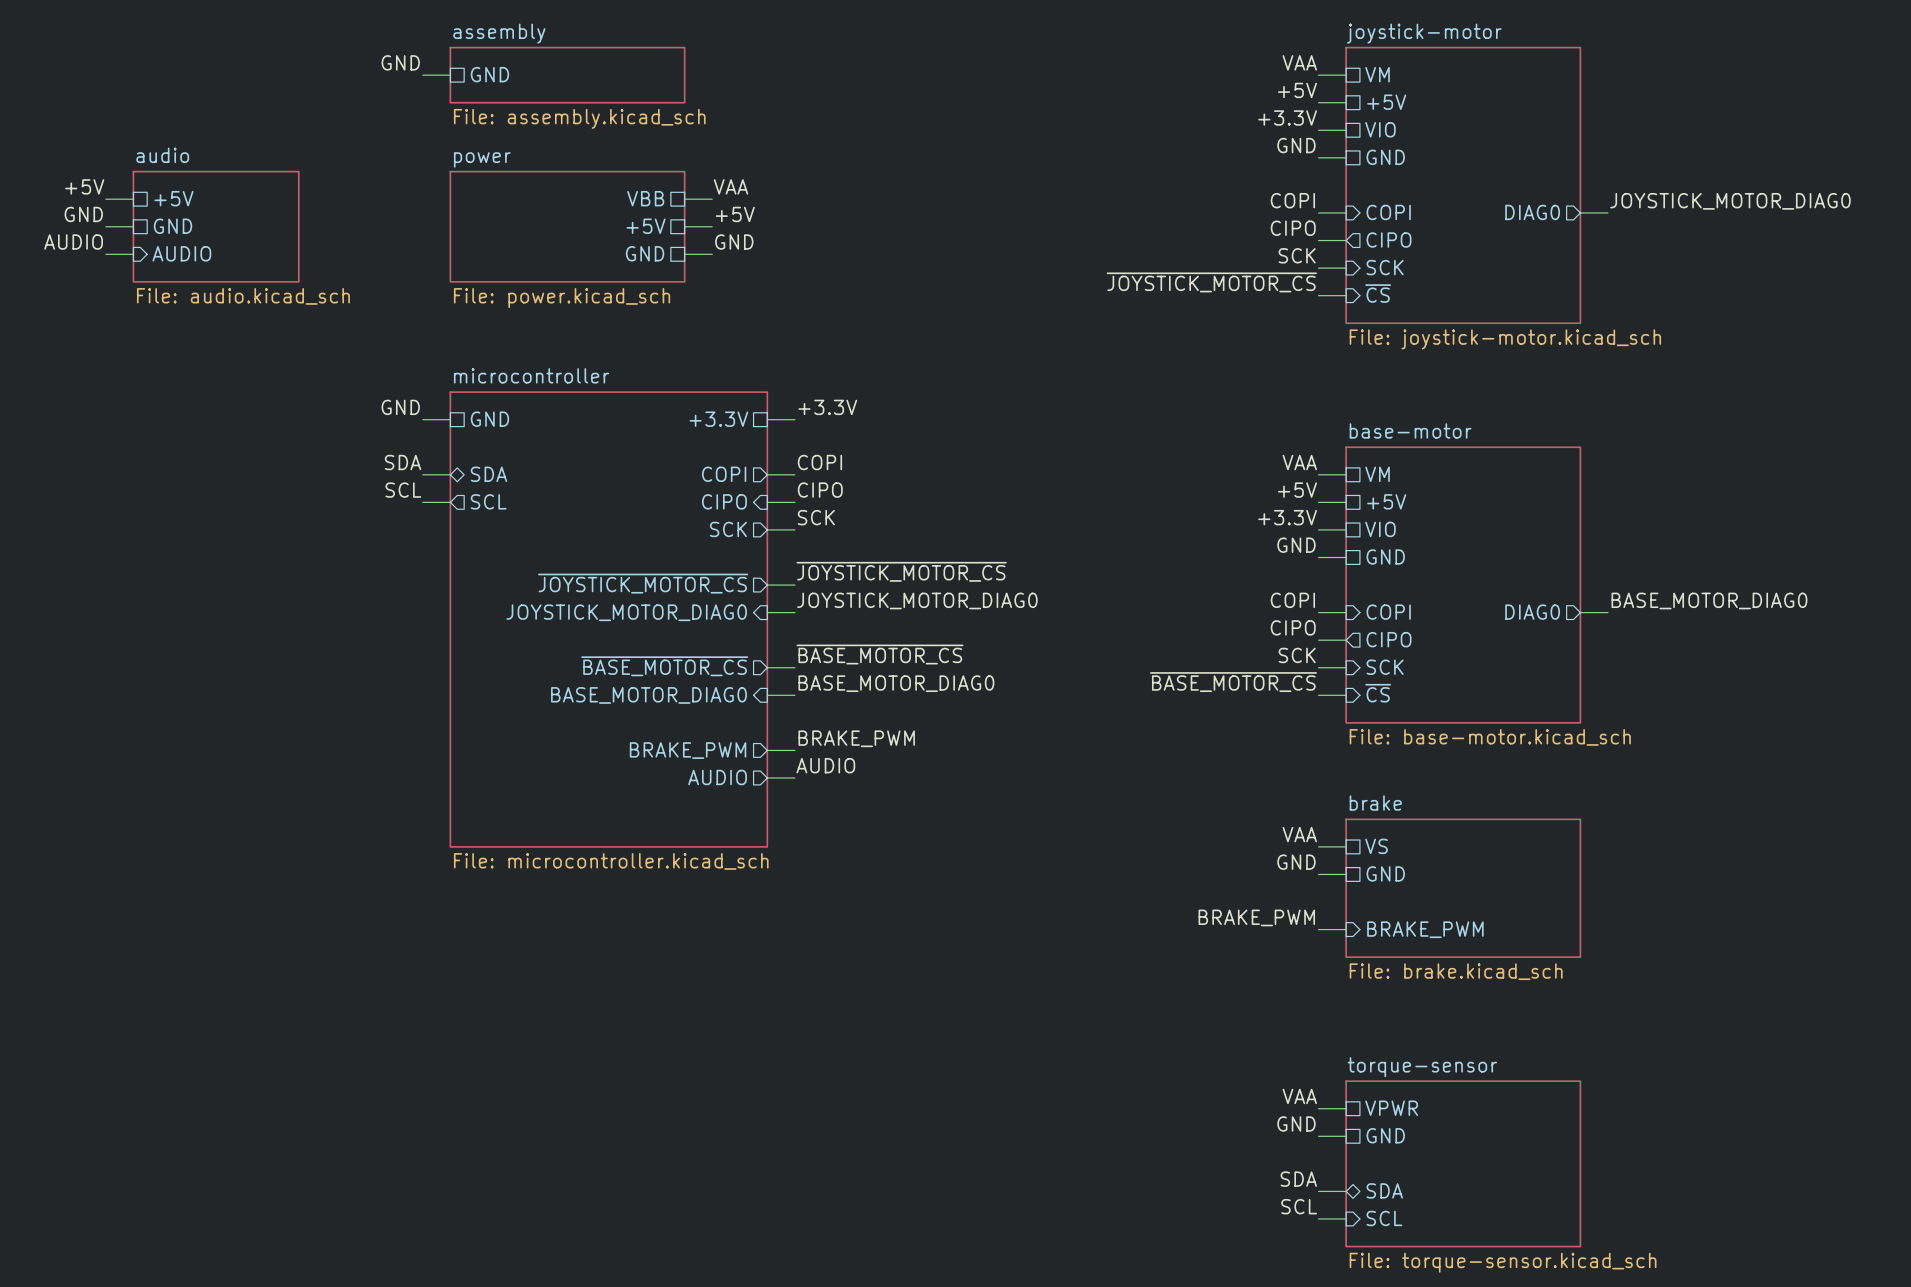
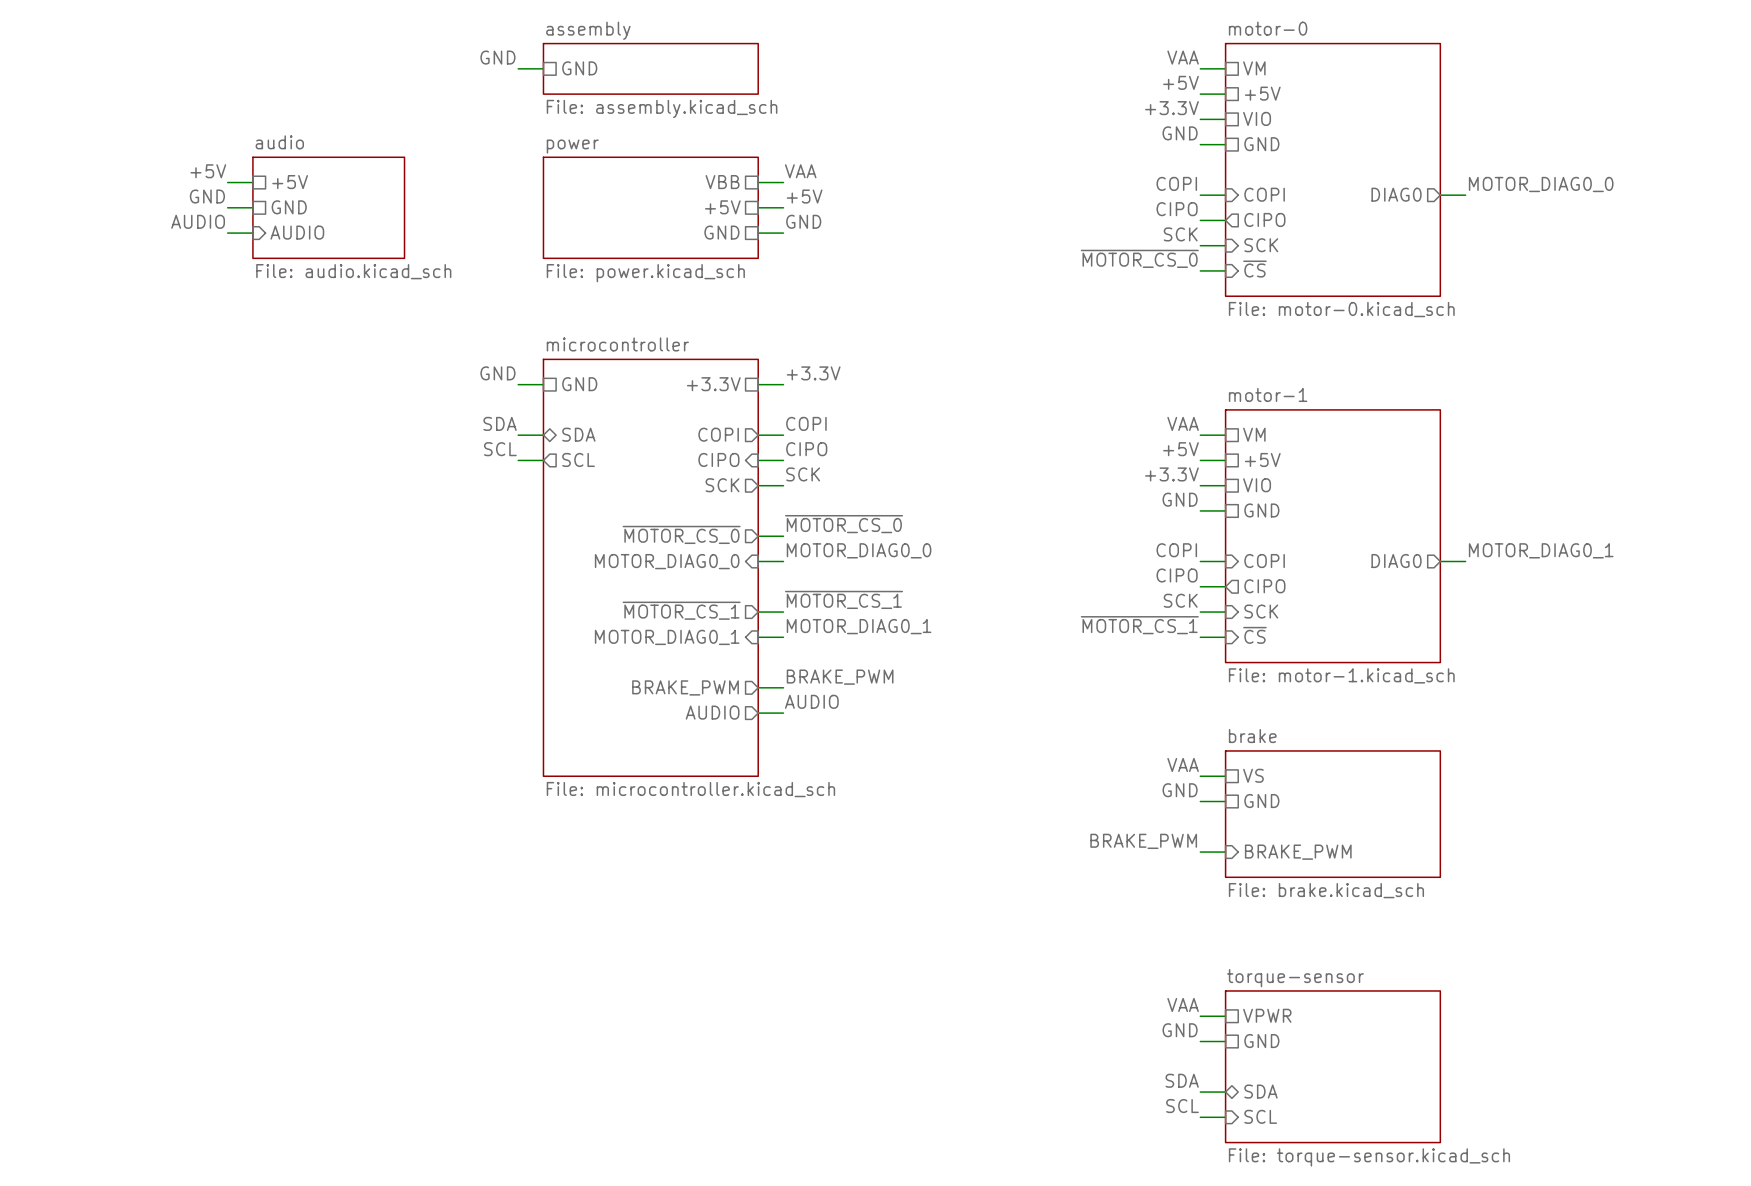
sheet joystick-motor name: joystick-motor (1424, 33) -> motor-0 (1268, 28)
label: GND (400, 62) -> none
label: none -> GND (497, 57)
sheet pin: GND (489, 74) -> none
sheet pin: none -> GND (579, 68)
wire: (422, 75) (450, 75) -> (518, 68) (543, 68)
sheet assembly position: (567, 75) -> (650, 68)
label position: +5V (84, 186) -> +5V (208, 171)
label position: VAA (731, 186) -> VAA (800, 171)
sheet pin position: +5V (173, 198) -> +5V (290, 182)
sheet pin position: VBB (645, 198) -> VBB (722, 182)
wire: (105, 199) (133, 199) -> (227, 182) (252, 182)
wire: (684, 199) (712, 199) -> (758, 182) (783, 182)
label: JOYSTICK_MOTOR_DIAG0 (1730, 201) -> MOTOR_DIAG0_0 (1541, 184)
label: GND (83, 214) -> none
label: none -> GND (207, 196)
label position: +5V (735, 214) -> +5V (804, 196)
wire: (105, 226) (133, 226) -> (227, 207) (252, 207)
sheet pin: GND (173, 226) -> none
sheet audio position: (216, 226) -> (328, 207)
sheet pin: none -> GND (289, 207)
sheet power position: (567, 226) -> (650, 207)
sheet pin position: +5V (646, 226) -> +5V (722, 207)
wire: (684, 226) (712, 226) -> (758, 207) (783, 207)
label position: AUDIO (73, 242) -> AUDIO (198, 221)
label: GND (734, 242) -> none
label: none -> GND (803, 221)
sheet pin position: AUDIO (181, 253) -> AUDIO (297, 232)
sheet pin: GND (645, 253) -> none
sheet pin: none -> GND (721, 232)
wire: (105, 254) (133, 254) -> (227, 233) (252, 233)
wire: (684, 254) (712, 254) -> (758, 233) (783, 233)
label: ~{JOYSTICK_MOTOR_CS} (1211, 282) -> ~{MOTOR_CS_0} (1139, 258)
sheet joystick-motor value: File: joystick-motor.kicad_sch (1505, 339) -> File: motor-0.kicad_sch (1341, 309)
label: GND (400, 407) -> none
label: none -> GND (497, 373)
label position: +3.3V (827, 407) -> +3.3V (813, 373)
wire: (422, 419) (450, 419) -> (518, 384) (543, 384)
sheet pin: GND (489, 419) -> none
sheet pin: none -> GND (579, 384)
sheet pin position: +3.3V (718, 419) -> +3.3V (713, 384)
wire: (767, 419) (794, 419) -> (758, 384) (783, 384)
sheet base-motor name: base-motor (1410, 430) -> motor-1 (1268, 394)
label position: SDA (403, 462) -> SDA (500, 423)
label position: COPI (819, 462) -> COPI (806, 423)
wire: (422, 474) (450, 474) -> (518, 435) (543, 435)
sheet pin position: SDA (488, 474) -> SDA (578, 434)
sheet pin position: COPI (724, 474) -> COPI (718, 434)
wire: (767, 474) (794, 474) -> (758, 435) (783, 435)
label position: SCL (403, 490) -> SCL (500, 449)
label position: CIPO (820, 490) -> CIPO (806, 449)
sheet pin position: SCL (488, 501) -> SCL (578, 459)
sheet pin position: CIPO (724, 501) -> CIPO (718, 459)
wire: (422, 502) (450, 502) -> (518, 460) (543, 460)
wire: (767, 502) (794, 502) -> (758, 460) (783, 460)
label position: SCK (816, 517) -> SCK (803, 474)
sheet pin position: SCK (728, 529) -> SCK (722, 485)
wire: (767, 529) (794, 529) -> (758, 485) (783, 485)
label: ~{JOYSTICK_MOTOR_CS} (901, 571) -> ~{MOTOR_CS_0} (844, 524)
sheet pin: ~{JOYSTICK_MOTOR_CS} (643, 583) -> ~{MOTOR_CS_0} (681, 534)
wire: (767, 585) (794, 585) -> (758, 536) (783, 536)
label: JOYSTICK_MOTOR_DIAG0 (917, 600) -> MOTOR_DIAG0_0 (859, 550)
label: BASE_MOTOR_DIAG0 (1709, 600) -> MOTOR_DIAG0_1 (1541, 550)
sheet pin: JOYSTICK_MOTOR_DIAG0 (626, 612) -> MOTOR_DIAG0_0 (667, 561)
wire: (767, 612) (794, 612) -> (758, 561) (783, 561)
sheet microcontroller: File: microcontroller.kicad_sch (608, 619) -> none
sheet microcontroller: none -> File: microcontroller.kicad_sch (650, 567)
label: ~{BASE_MOTOR_CS} (879, 654) -> ~{MOTOR_CS_1} (844, 599)
sheet pin: ~{BASE_MOTOR_CS} (664, 666) -> ~{MOTOR_CS_1} (681, 610)
wire: (767, 667) (794, 667) -> (758, 612) (783, 612)
label: ~{BASE_MOTOR_CS} (1233, 682) -> ~{MOTOR_CS_1} (1139, 625)
label: BASE_MOTOR_DIAG0 (896, 683) -> MOTOR_DIAG0_1 (859, 626)
sheet pin: BASE_MOTOR_DIAG0 (649, 695) -> MOTOR_DIAG0_1 (667, 637)
wire: (767, 695) (794, 695) -> (758, 637) (783, 637)
sheet base-motor value: File: base-motor.kicad_sch (1490, 737) -> File: motor-1.kicad_sch (1341, 675)
label position: BRAKE_PWM (856, 738) -> BRAKE_PWM (840, 677)
sheet pin position: BRAKE_PWM (688, 750) -> BRAKE_PWM (685, 687)
wire: (767, 750) (794, 750) -> (758, 687) (783, 687)
label position: AUDIO (825, 765) -> AUDIO (811, 701)
sheet pin position: AUDIO (717, 777) -> AUDIO (712, 712)
wire: (767, 777) (794, 777) -> (758, 713) (783, 713)

